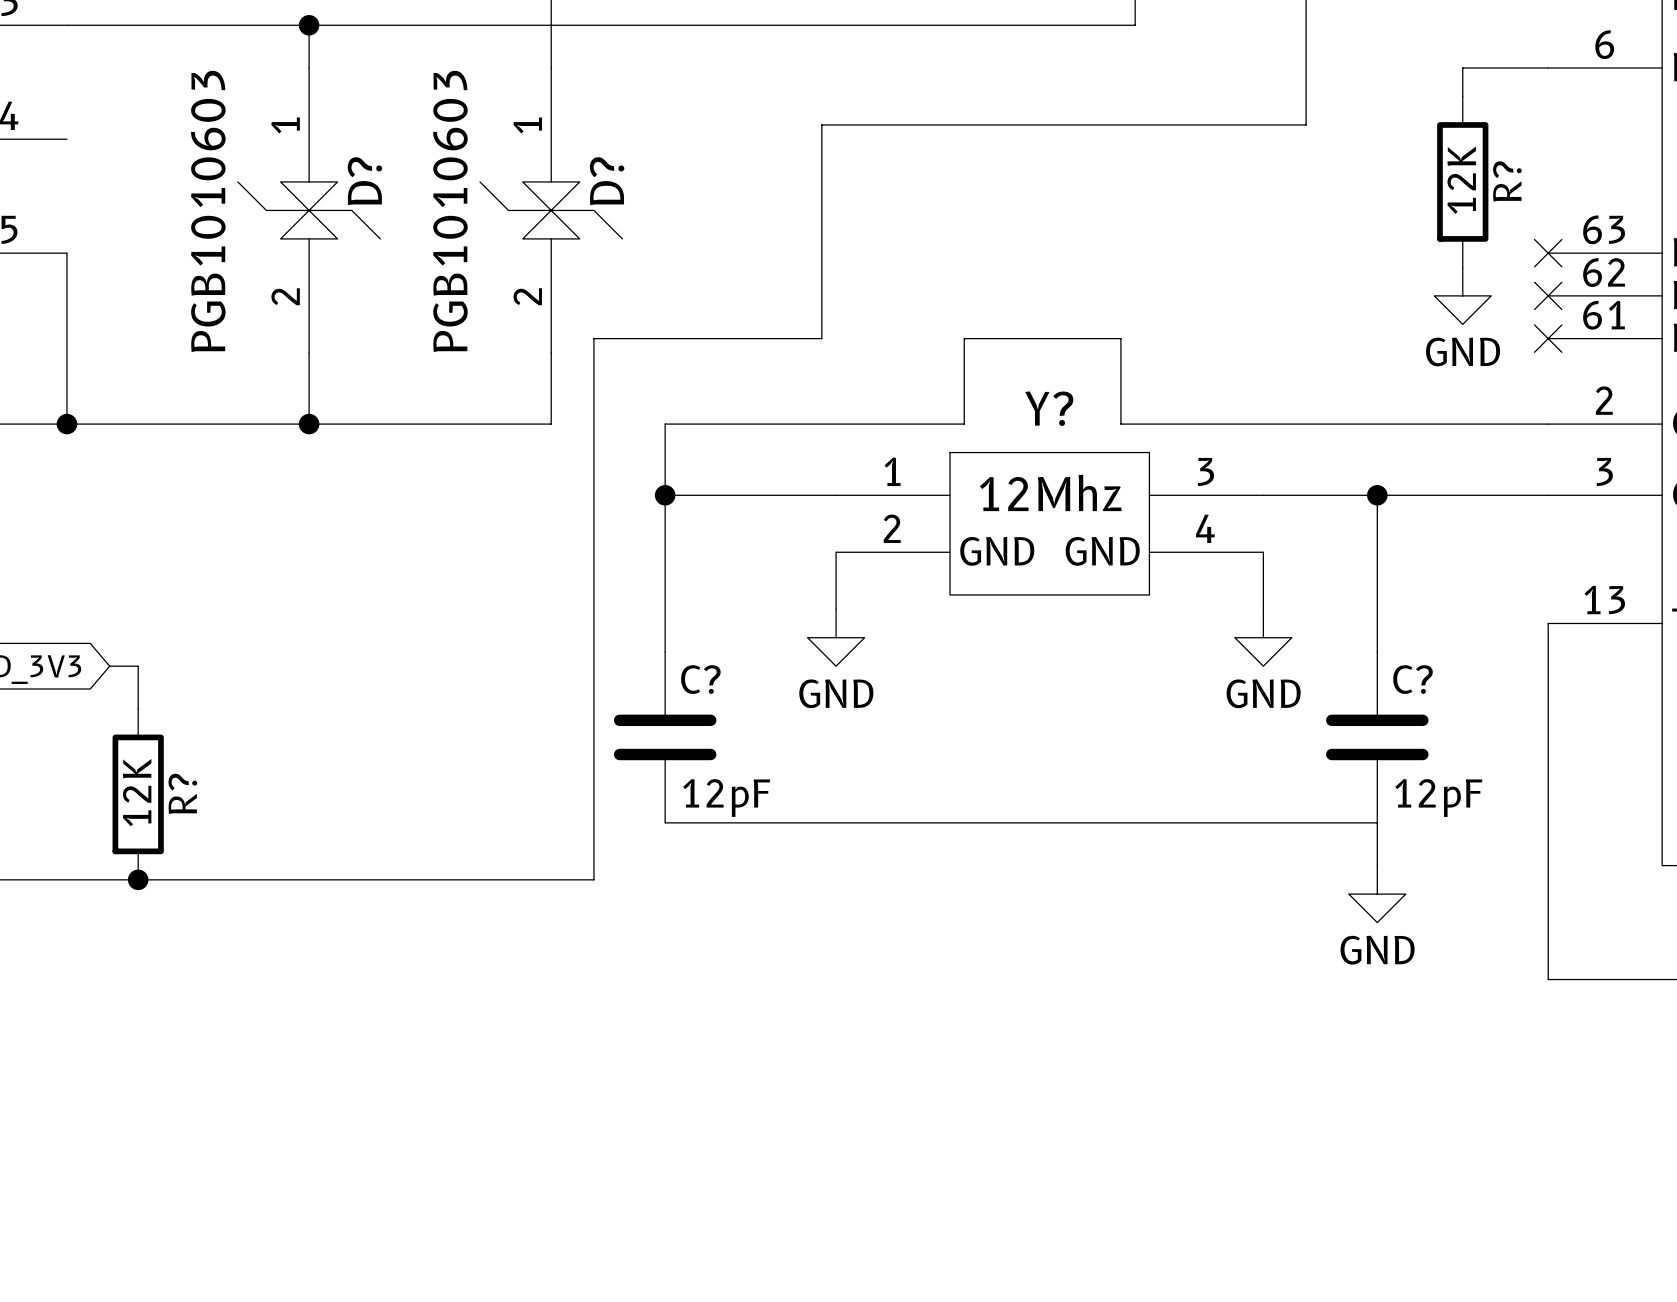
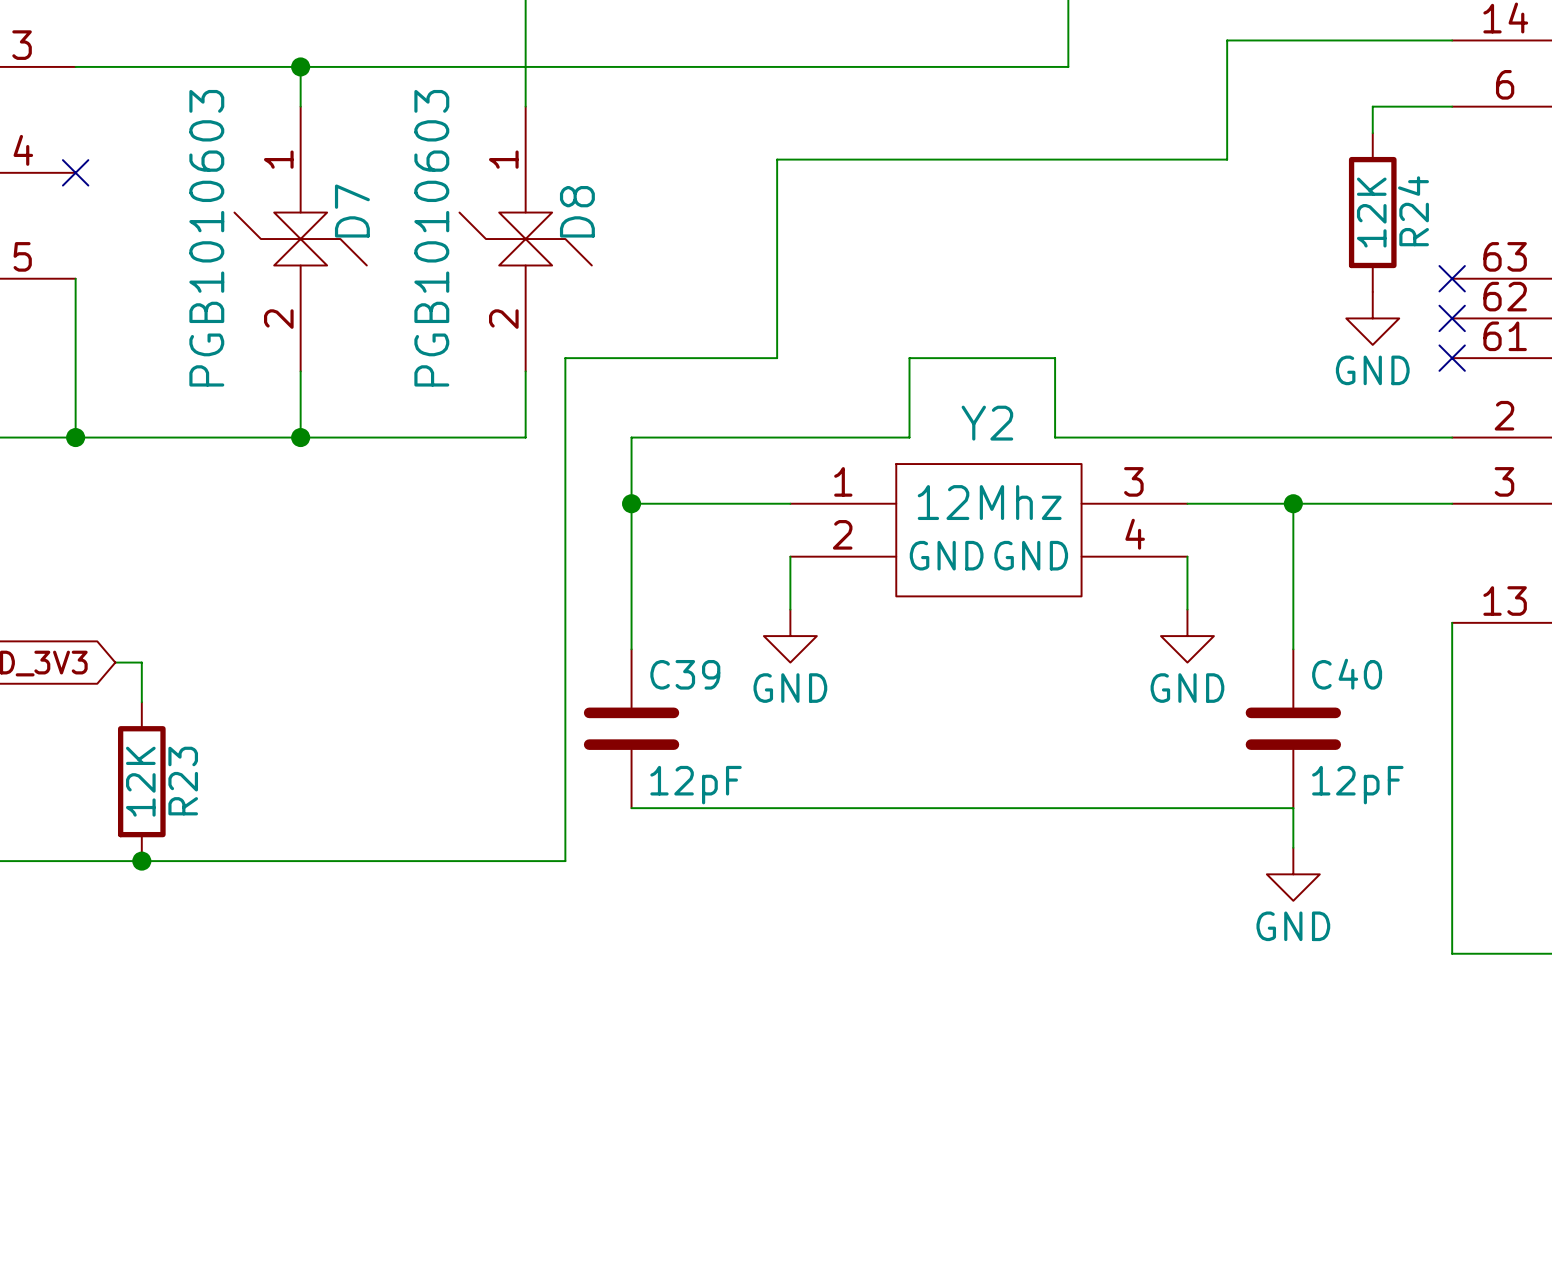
no-connect mark: none -> (75, 172)
D? name: D? (364, 181) -> D7 (352, 211)
D? name: D? (607, 181) -> D8 (577, 211)
R? name: R? (1507, 181) -> R24 (1413, 211)
Y? name: Y? (1049, 408) -> Y2 (987, 423)
C? name: C? (700, 679) -> C39 (685, 674)
C? name: C? (1413, 679) -> C40 (1347, 674)
R? name: R? (182, 793) -> R23 (183, 781)

